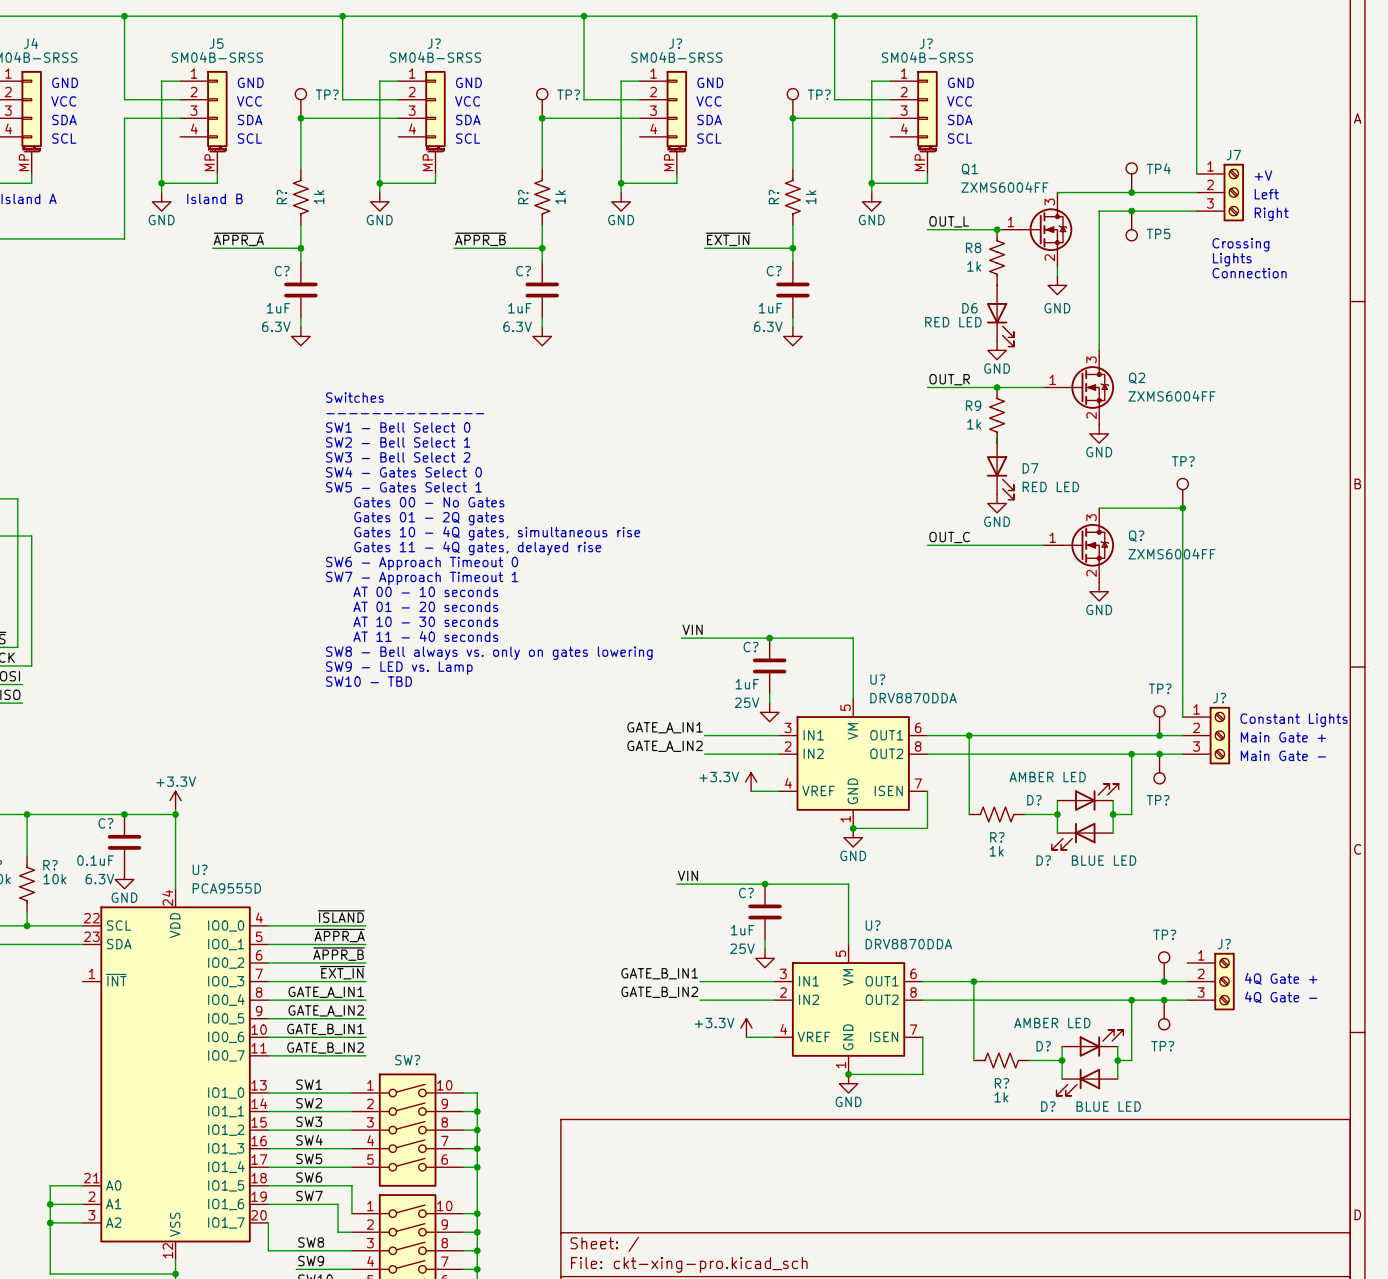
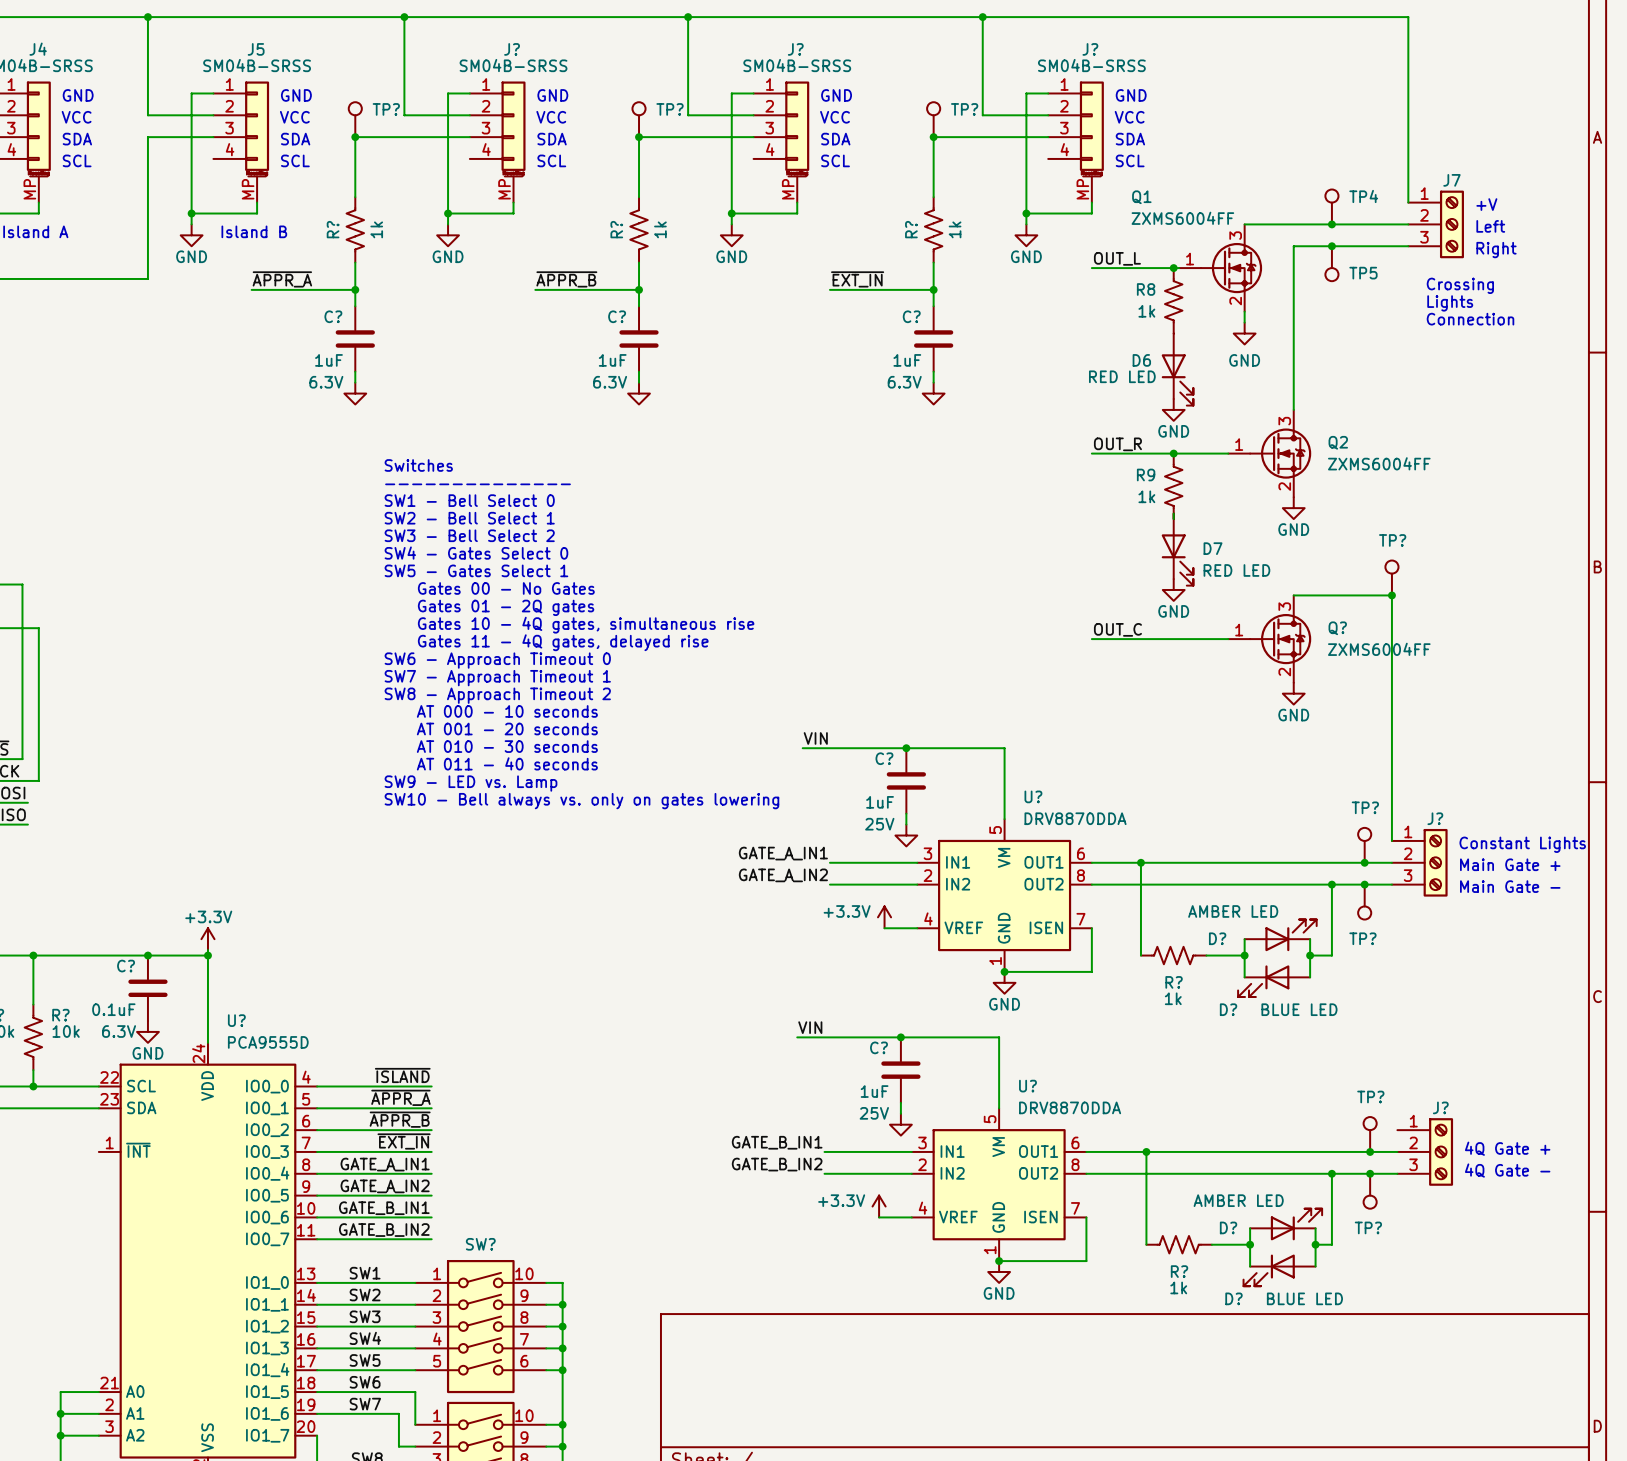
text: AT 00 - 10 seconds (425, 591) -> SW8 - Approach Timeout 2 (497, 695)
text: AT 01 - 20 seconds (425, 606) -> AT 000 - 10 seconds (507, 711)
text: AT 10 - 30 seconds (425, 621) -> AT 001 - 20 seconds (507, 729)
text: AT 11 - 40 seconds (425, 636) -> AT 010 - 30 seconds (507, 746)
text: SW8 - Bell always vs. only on gates lowering (489, 653) -> AT 011 - 40 seconds (507, 763)
text: SW10 - TBD (369, 681) -> SW10 - Bell always vs. only on gates lowering (581, 801)

